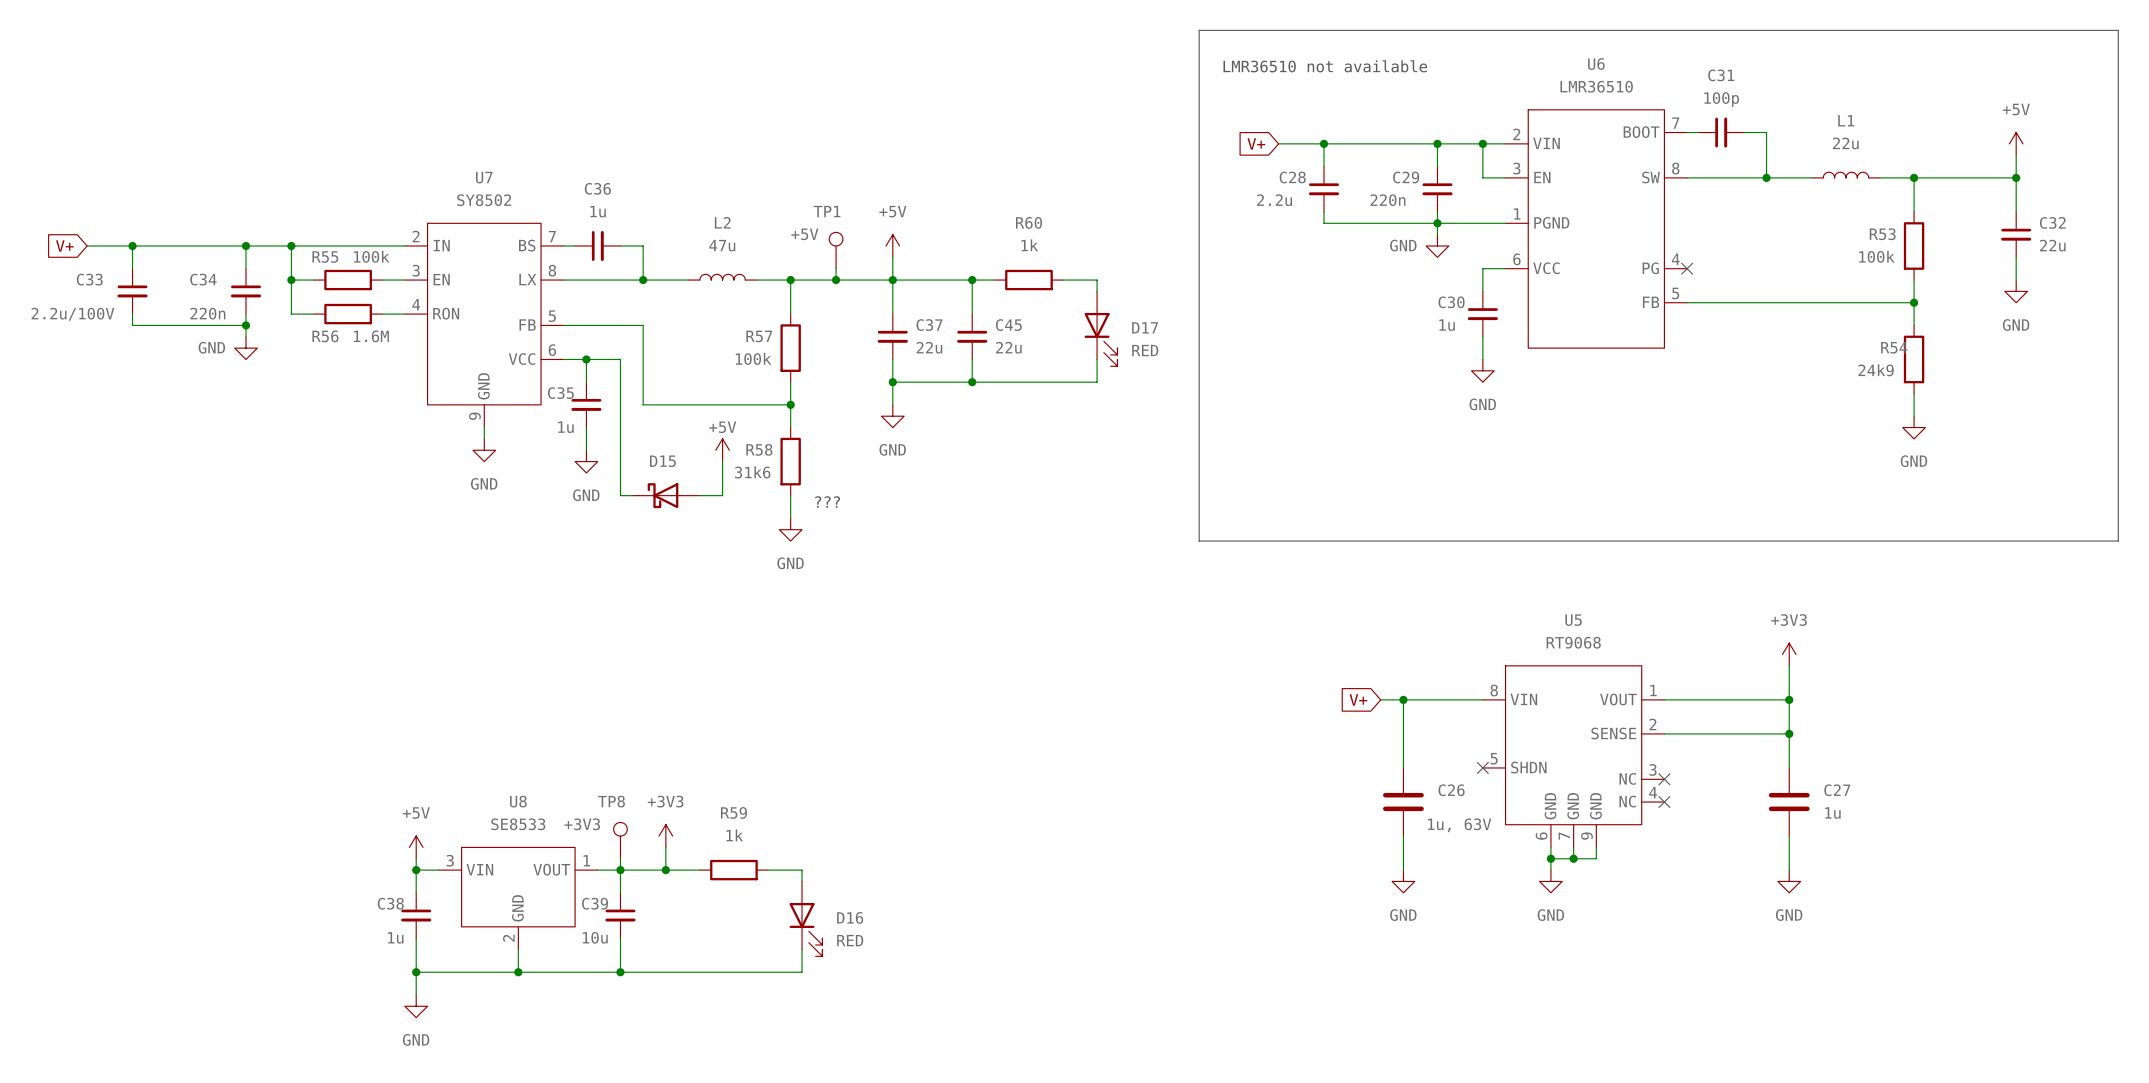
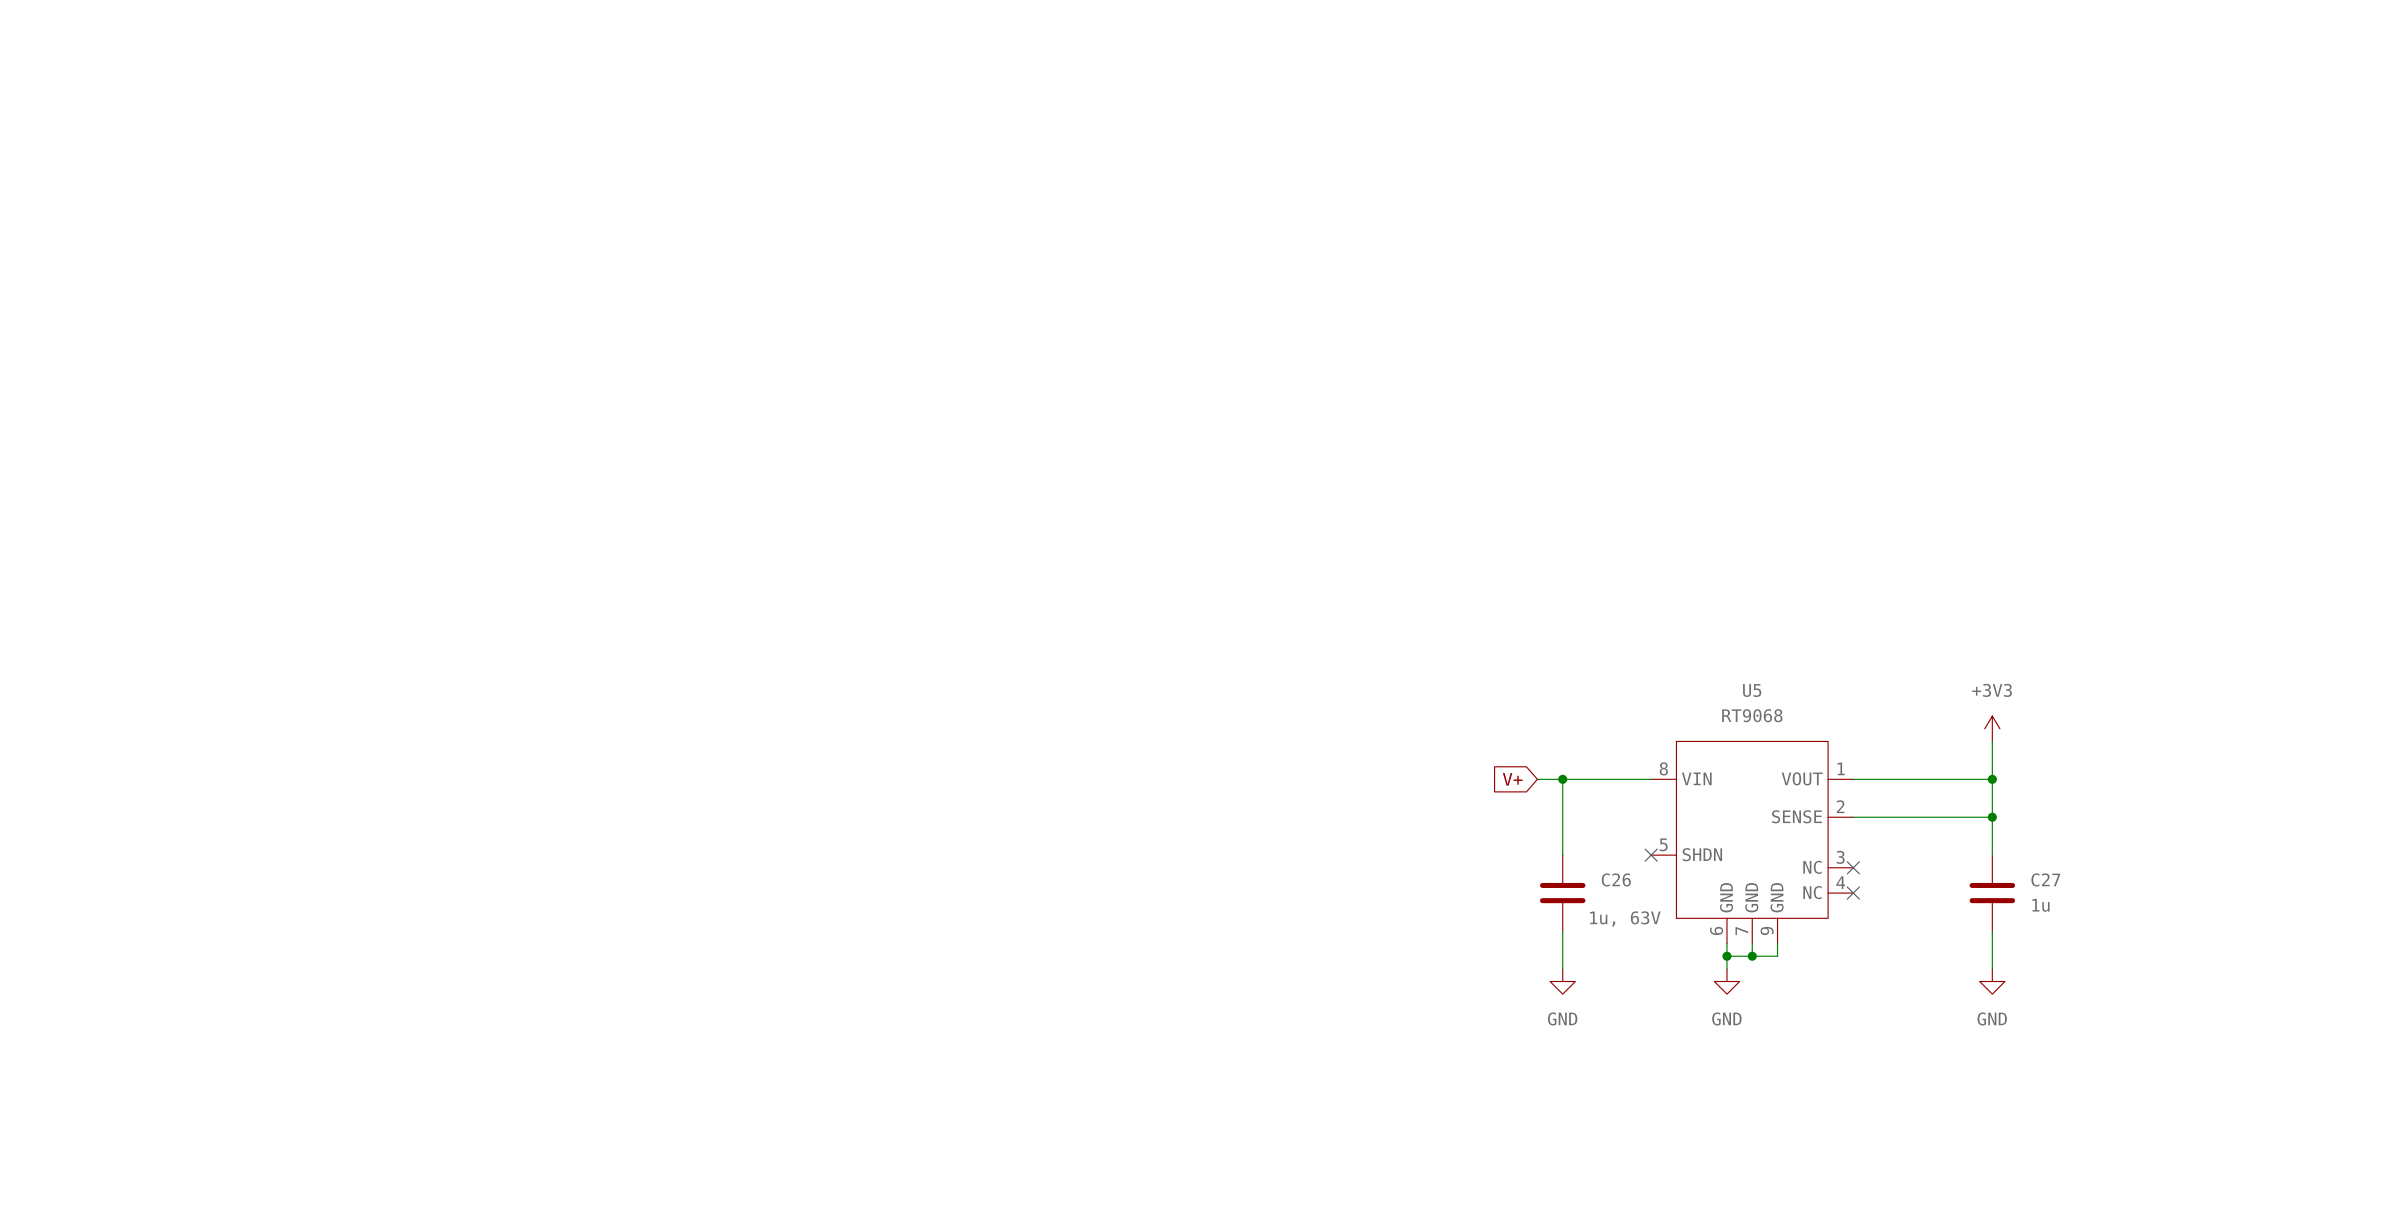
line: (1199, 30) (2118, 30) (2118, 541) (1199, 541) (1199, 30) -> none
text: LMR36510 not available (1325, 66) -> none
wire: (1687, 132) (1698, 132) -> none
C31: 100p (1721, 132) -> none
wire: (1743, 132) (1766, 132) (1766, 177) -> none
global label: V+ (1256, 143) -> none
wire: (1278, 143) (1505, 143) -> none
wire: (1324, 143) (1324, 166) -> none
junction: (1324, 143) -> none
wire: (1437, 143) (1437, 166) -> none
junction: (1437, 143) -> none
wire: (1482, 143) (1482, 177) (1505, 177) -> none
junction: (1482, 143) -> none
power symbol: +5V (2016, 143) -> none
wire: (2016, 155) (2016, 211) -> none
L1: 22u (1845, 175) -> none
wire: (1687, 177) (1811, 177) -> none
junction: (1766, 177) -> none
wire: (1880, 177) (2016, 177) -> none
wire: (1914, 177) (1914, 211) -> none
junction: (1914, 177) -> none
junction: (2016, 177) -> none
C28: 2.2u (1324, 189) -> none
C29: 220n (1437, 189) -> none
wire: (1324, 211) (1324, 223) (1505, 223) -> none
wire: (1437, 211) (1437, 234) -> none
junction: (1437, 223) -> none
U6: LMR36510 (1596, 228) -> none
C32: 22u (2016, 234) -> none
global label: V+ (64, 246) -> none
wire: (87, 246) (404, 246) -> none
wire: (132, 246) (132, 268) -> none
junction: (132, 246) -> none
wire: (246, 246) (246, 268) -> none
junction: (246, 246) -> none
wire: (291, 246) (291, 314) (314, 314) -> none
junction: (291, 246) -> none
wire: (563, 246) (575, 246) -> none
C36: 1u (597, 246) -> none
wire: (620, 246) (643, 246) (643, 280) -> none
power symbol: +5V (892, 246) -> none
power symbol: GND (1437, 246) -> none
R53: 100k (1914, 246) -> none
TP1: +5V (836, 250) -> none
wire: (892, 257) (892, 314) -> none
wire: (2016, 257) (2016, 280) -> none
wire: (836, 268) (836, 280) -> none
wire: (1505, 268) (1482, 268) (1482, 291) -> none
no-connect mark: (1687, 268) -> none
L2: 47u (722, 277) -> none
wire: (291, 280) (314, 280) -> none
junction: (291, 280) -> none
R55: 100k (348, 280) -> none
wire: (382, 280) (404, 280) -> none
wire: (563, 280) (688, 280) -> none
junction: (643, 280) -> none
wire: (756, 280) (994, 280) -> none
wire: (790, 280) (790, 314) -> none
junction: (790, 280) -> none
junction: (836, 280) -> none
junction: (892, 280) -> none
wire: (972, 280) (972, 314) -> none
junction: (972, 280) -> none
R60: 1k (1028, 280) -> none
wire: (1063, 280) (1097, 280) (1097, 291) -> none
wire: (1914, 280) (1914, 325) -> none
C33: 2.2u/100V (132, 291) -> none
C34: 220n (246, 291) -> none
power symbol: GND (2016, 291) -> none
wire: (1687, 302) (1914, 302) -> none
junction: (1914, 302) -> none
wire: (132, 314) (132, 325) (246, 325) -> none
wire: (246, 314) (246, 336) -> none
R56: 1.6M (348, 314) -> none
wire: (382, 314) (404, 314) -> none
C30: 1u (1482, 314) -> none
junction: (246, 325) -> none
U7: SY8502 (484, 325) -> none
wire: (563, 325) (643, 325) (643, 404) (790, 404) -> none
D17: RED (1101, 328) -> none
C37: 22u (892, 336) -> none
C45: 22u (972, 336) -> none
wire: (1482, 336) (1482, 359) -> none
power symbol: GND (246, 348) -> none
R57: 100k (790, 348) -> none
wire: (563, 359) (620, 359) (620, 495) (631, 495) -> none
wire: (586, 359) (586, 382) -> none
junction: (586, 359) -> none
wire: (892, 359) (892, 404) -> none
wire: (972, 359) (972, 382) -> none
wire: (1097, 359) (1097, 382) (892, 382) -> none
R54: 24k9 (1914, 359) -> none
power symbol: GND (1482, 370) -> none
wire: (790, 382) (790, 427) -> none
junction: (892, 382) -> none
junction: (972, 382) -> none
wire: (1914, 393) (1914, 416) -> none
C35: 1u (586, 404) -> none
junction: (790, 404) -> none
power symbol: GND (892, 416) -> none
wire: (484, 427) (484, 438) -> none
wire: (586, 427) (586, 450) -> none
power symbol: GND (1914, 427) -> none
power symbol: GND (484, 450) -> none
power symbol: +5V (722, 450) -> none
power symbol: GND (586, 461) -> none
wire: (722, 461) (722, 495) (699, 495) -> none
R58: 31k6 (790, 461) -> none
D15: (665, 495) -> none
wire: (790, 495) (790, 518) -> none
text: ??? (827, 502) -> none
power symbol: GND (790, 529) -> none
power symbol: +3V3 (665, 836) -> none
TP8: +3V3 (620, 840) -> none
power symbol: +5V (416, 847) -> none
wire: (665, 847) (665, 870) -> none
wire: (416, 858) (416, 892) -> none
wire: (620, 858) (620, 892) -> none
wire: (416, 870) (438, 870) -> none
junction: (416, 870) -> none
wire: (597, 870) (699, 870) -> none
junction: (620, 870) -> none
junction: (665, 870) -> none
R59: 1k (733, 870) -> none
wire: (767, 870) (802, 870) (802, 881) -> none
U8: SE8533 (518, 898) -> none
C38: 1u (416, 915) -> none
C39: 10u (620, 915) -> none
D16: RED (805, 918) -> none
wire: (416, 938) (416, 994) -> none
wire: (620, 938) (620, 972) -> none
wire: (518, 949) (518, 972) -> none
wire: (802, 949) (802, 972) (416, 972) -> none
junction: (416, 972) -> none
junction: (518, 972) -> none
junction: (620, 972) -> none
power symbol: GND (416, 1006) -> none

